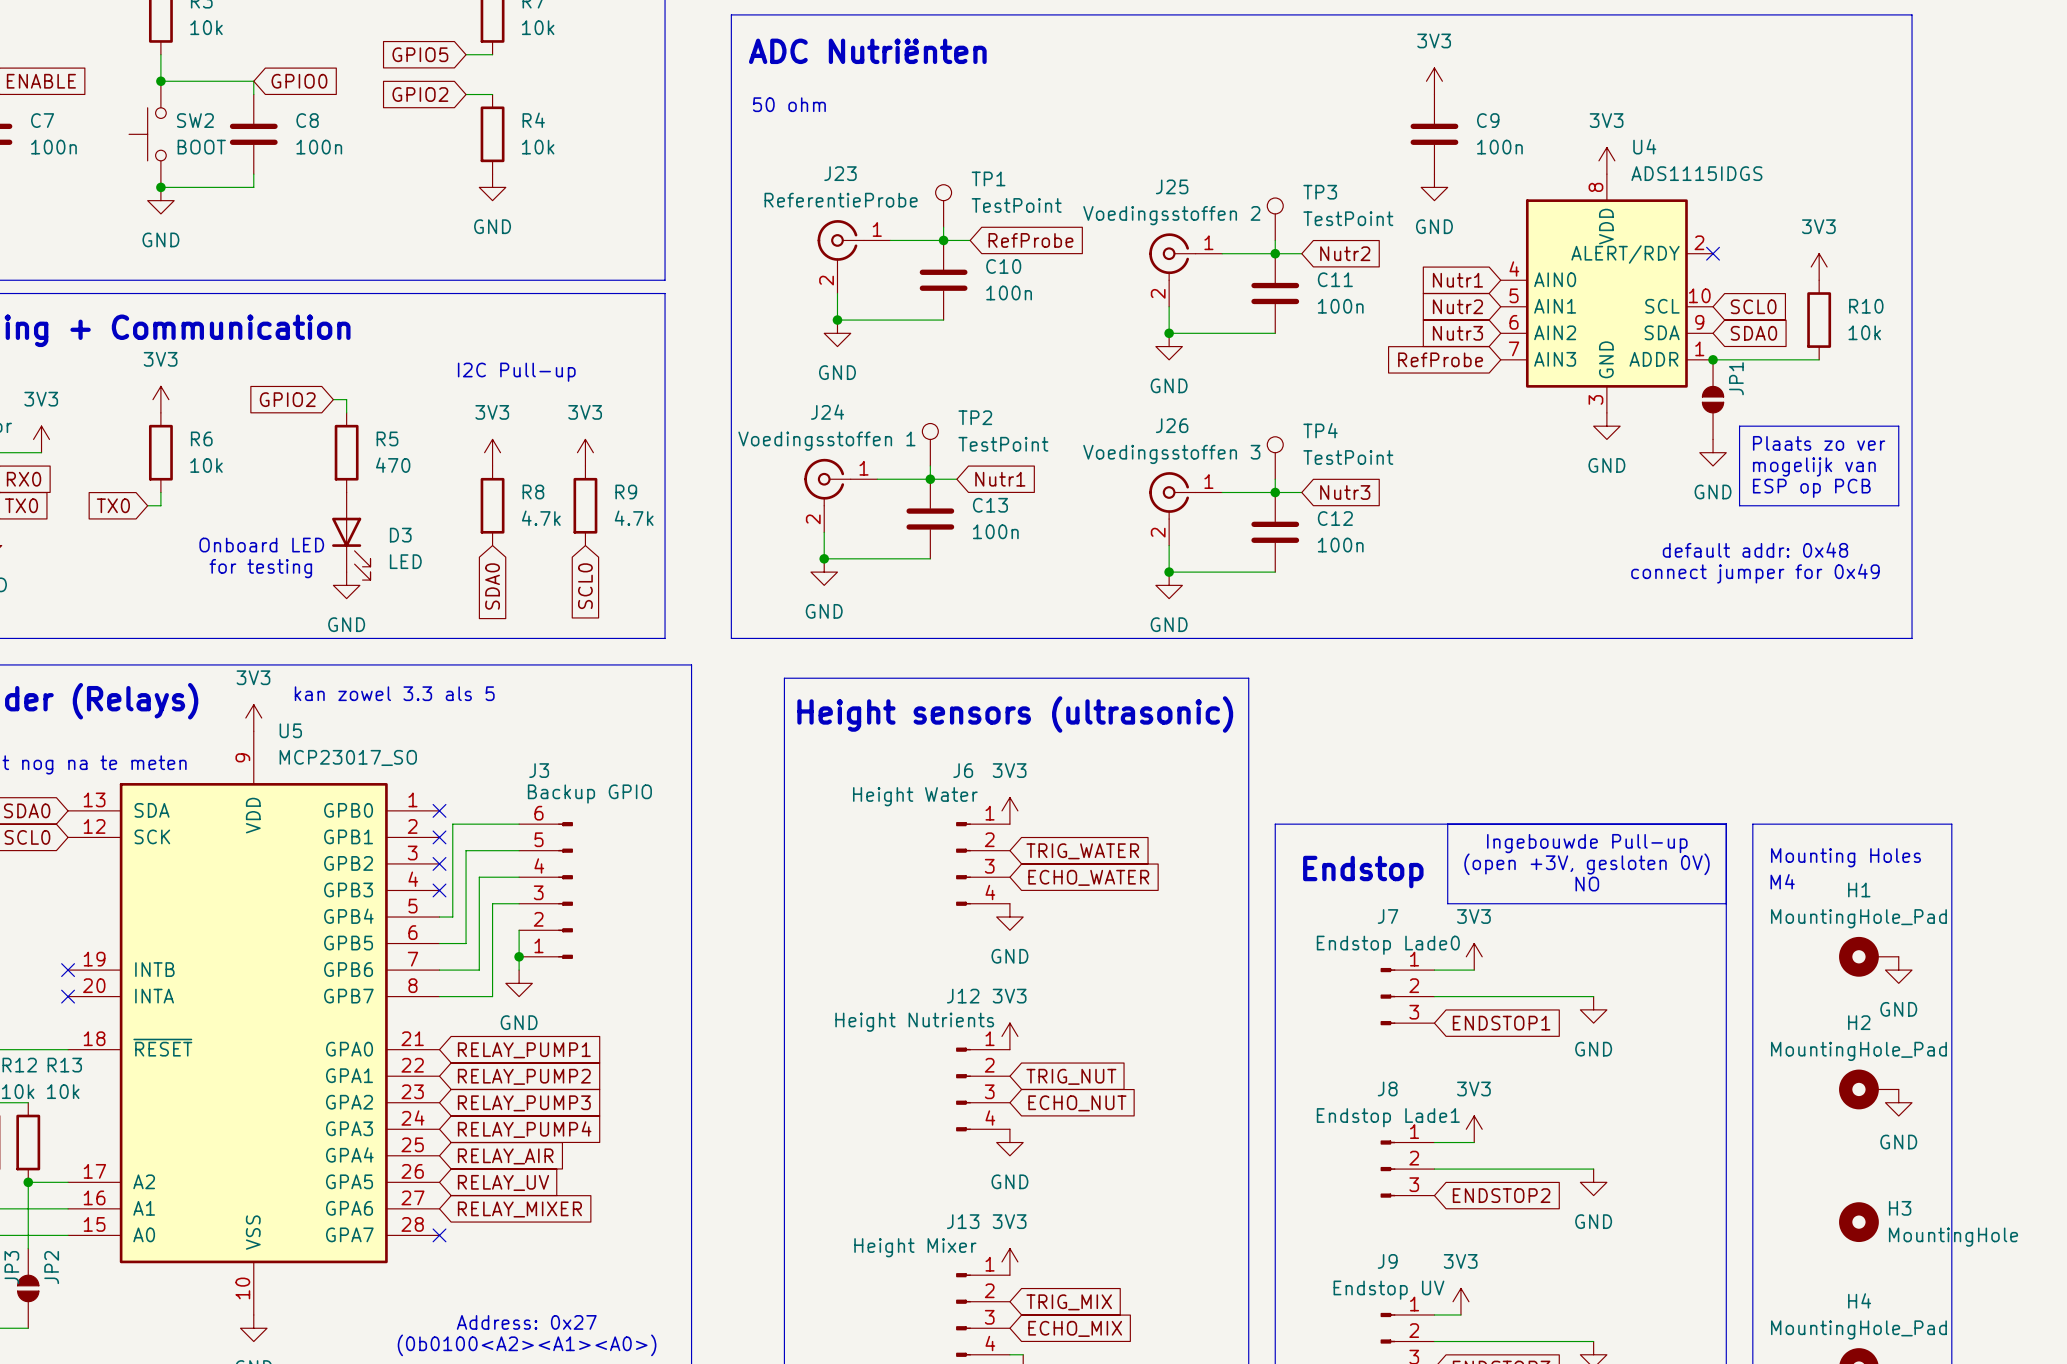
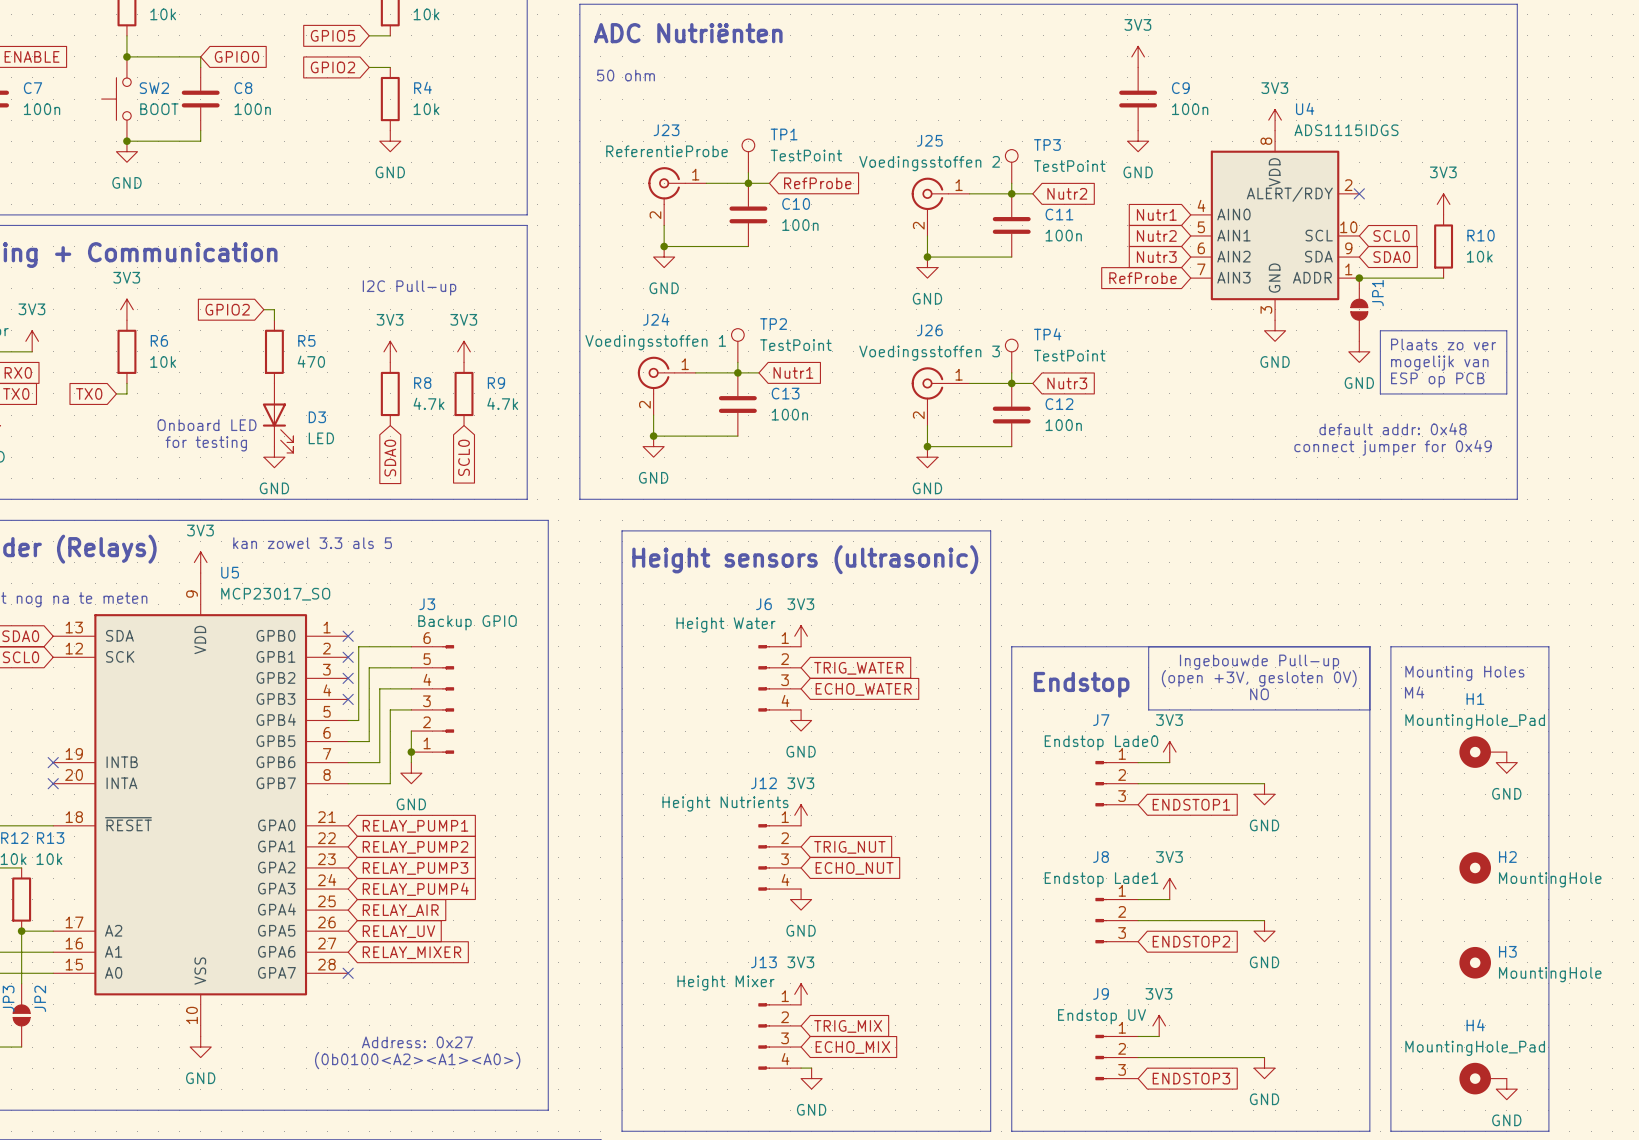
H2 name position: H2 (1859, 1022) -> H2 (1507, 857)
H2 value: MountingHole_Pad (1858, 1051) -> MountingHole (1550, 879)
H2 symbol: [1839, 1069, 1899, 1110] -> [1459, 852, 1491, 884]
power symbol: GND (1898, 1102) -> none

